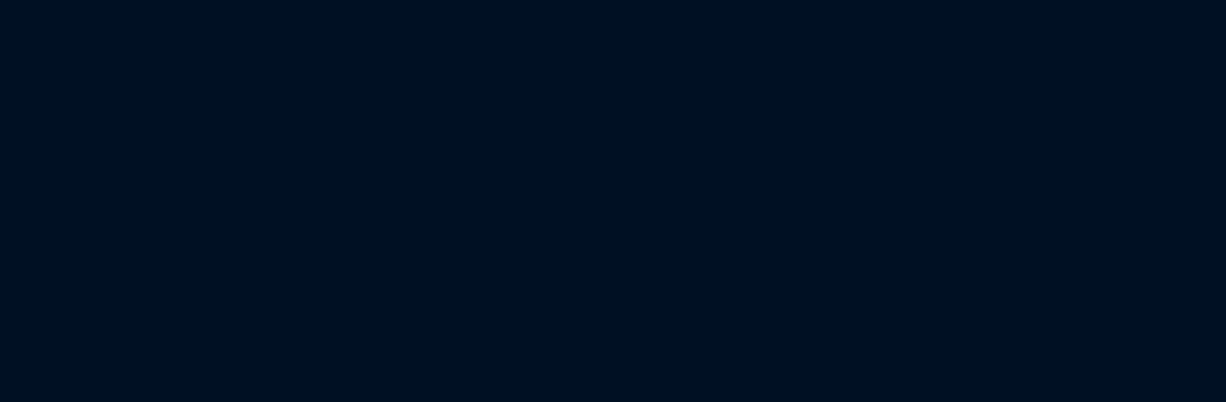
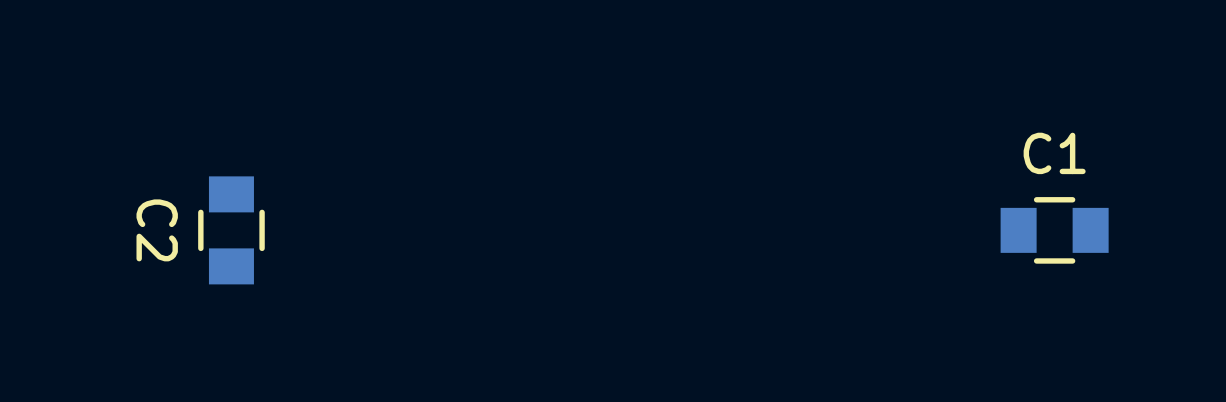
C2: none -> (231, 230)
C1: none -> (1054, 230)

